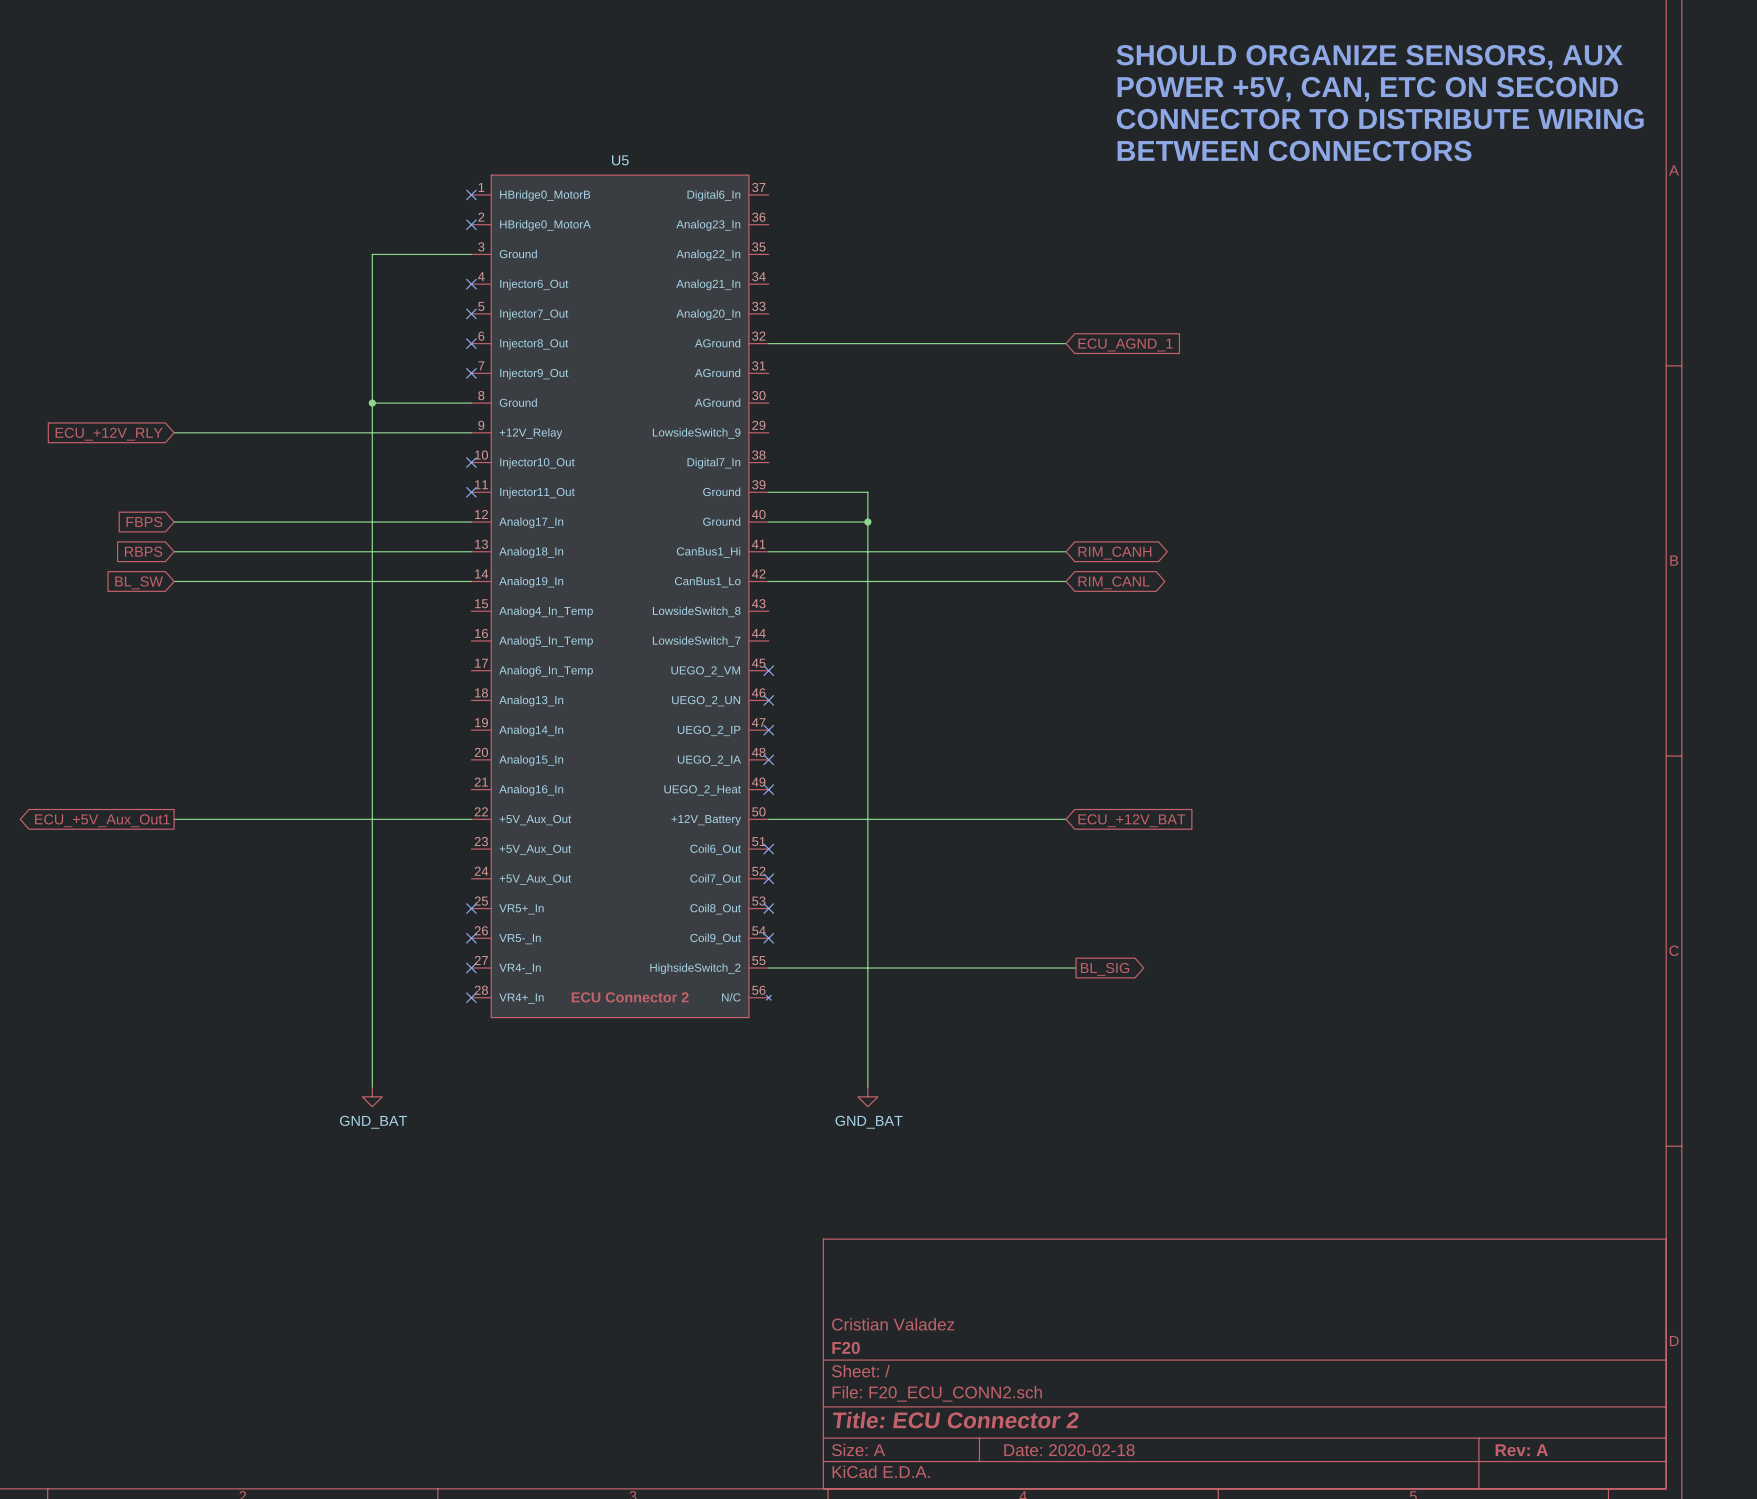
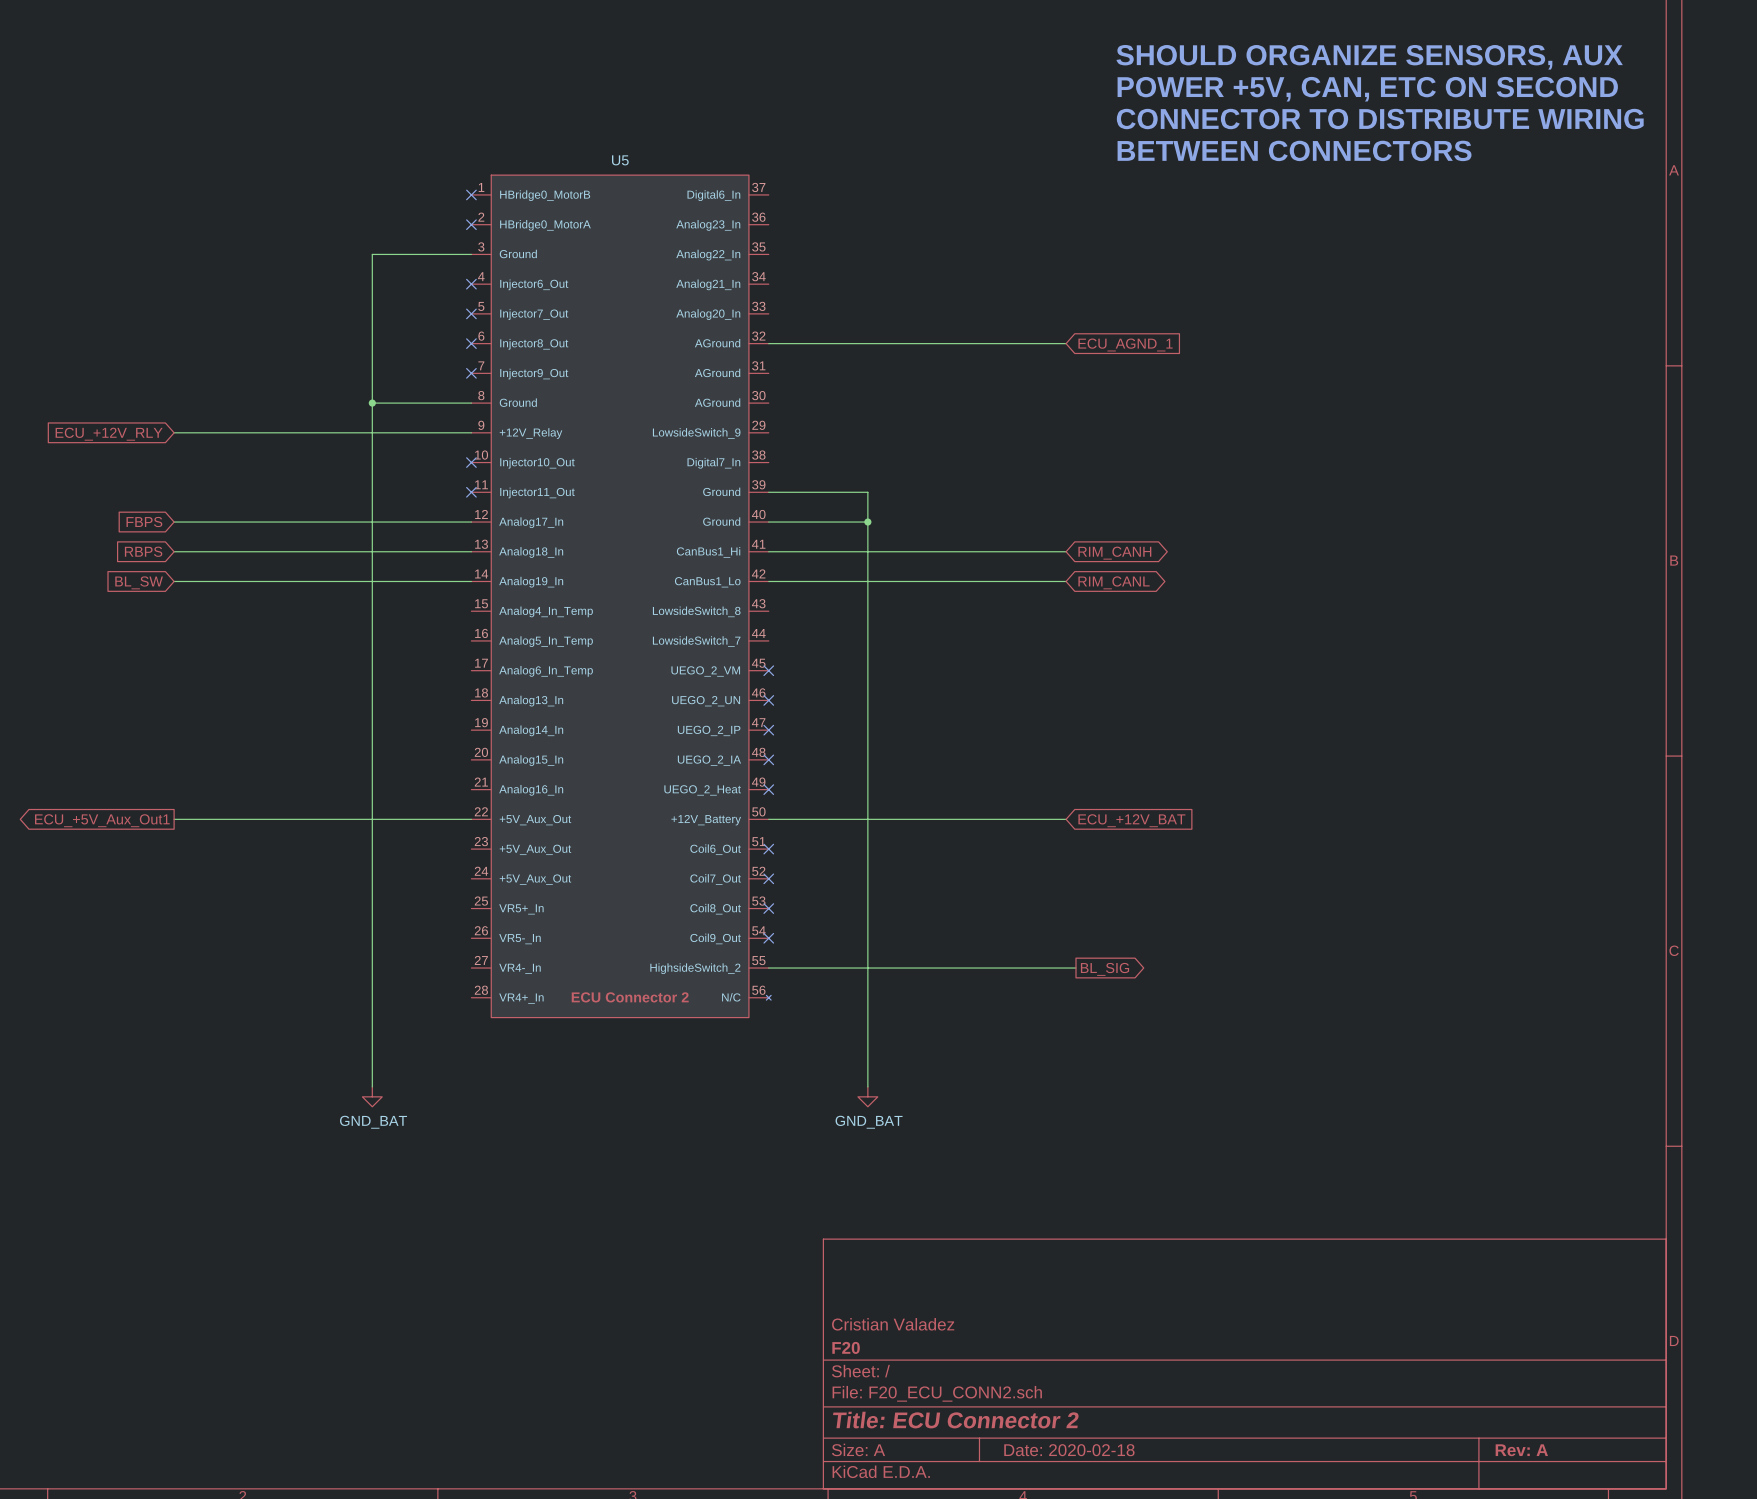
no-connect mark: (471, 908) -> none
no-connect mark: (471, 938) -> none
no-connect mark: (471, 968) -> none
no-connect mark: (471, 997) -> none

